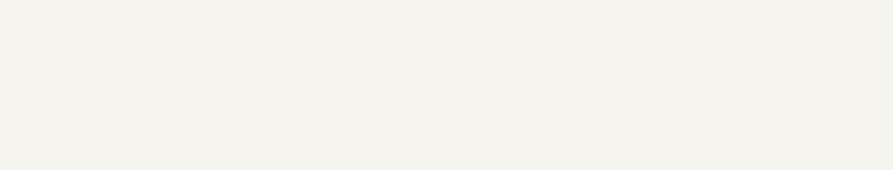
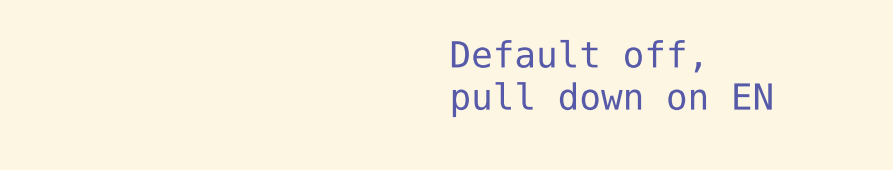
text: none -> Default off, (576, 56)
text: none -> pull down on EN (612, 99)

